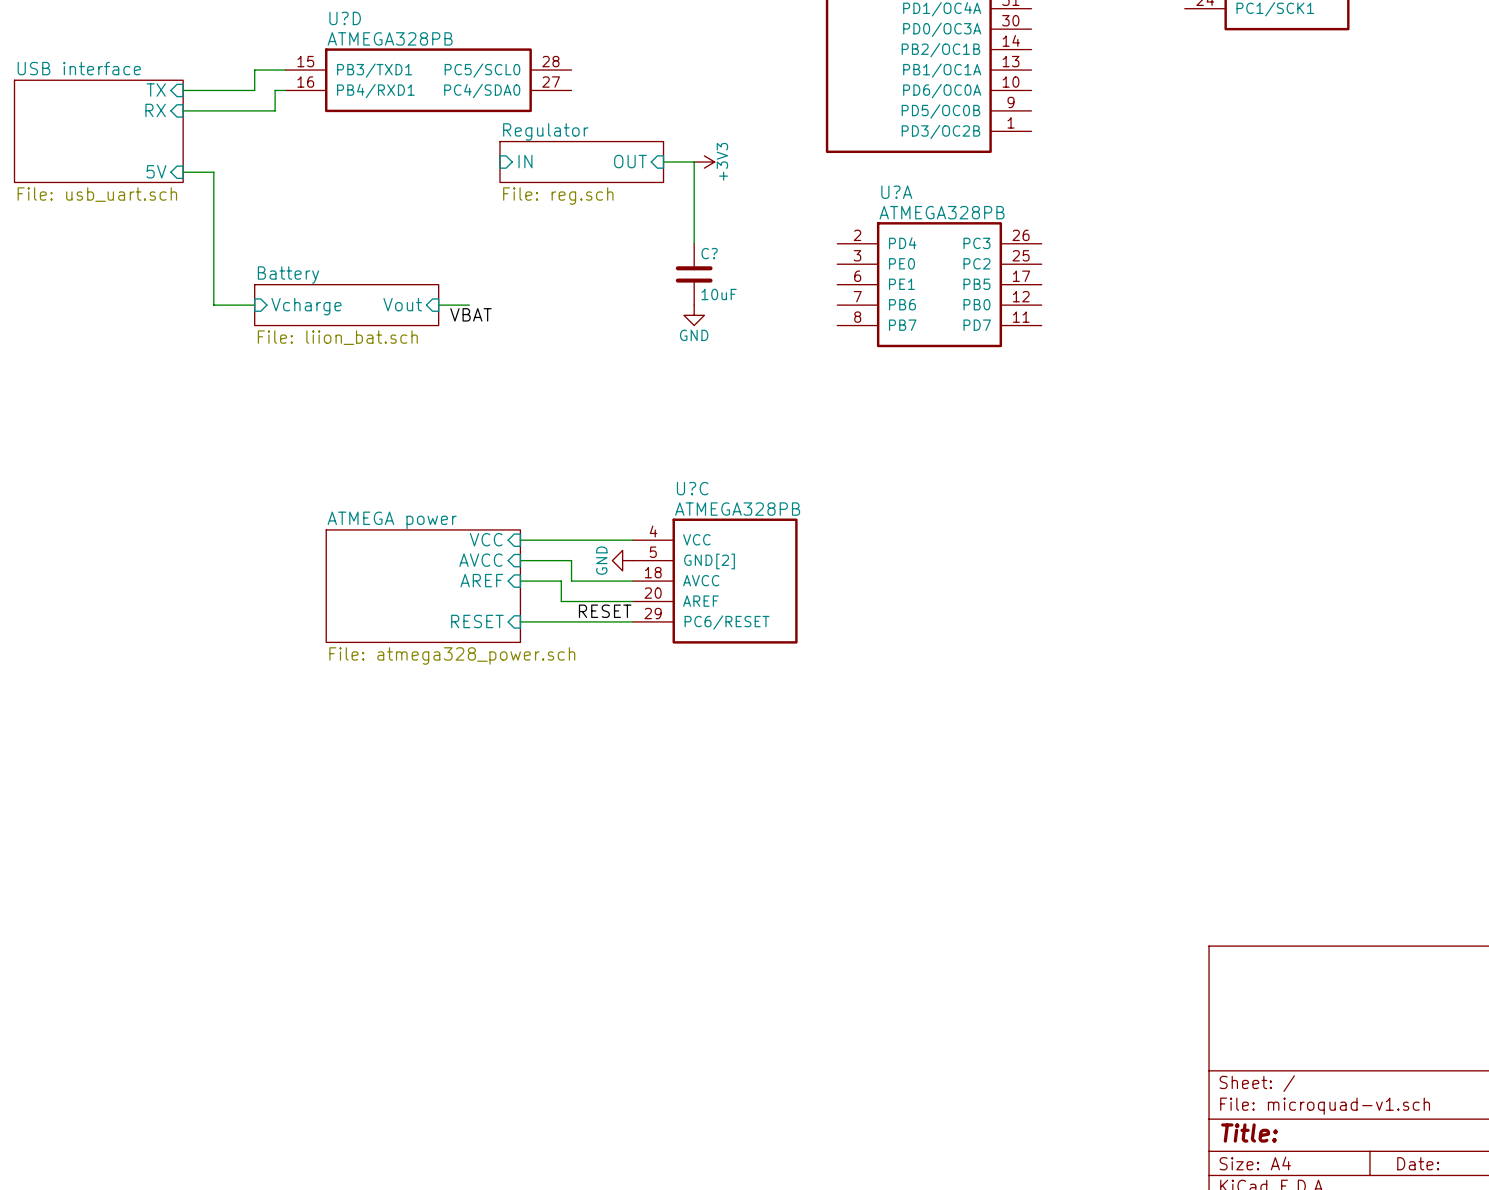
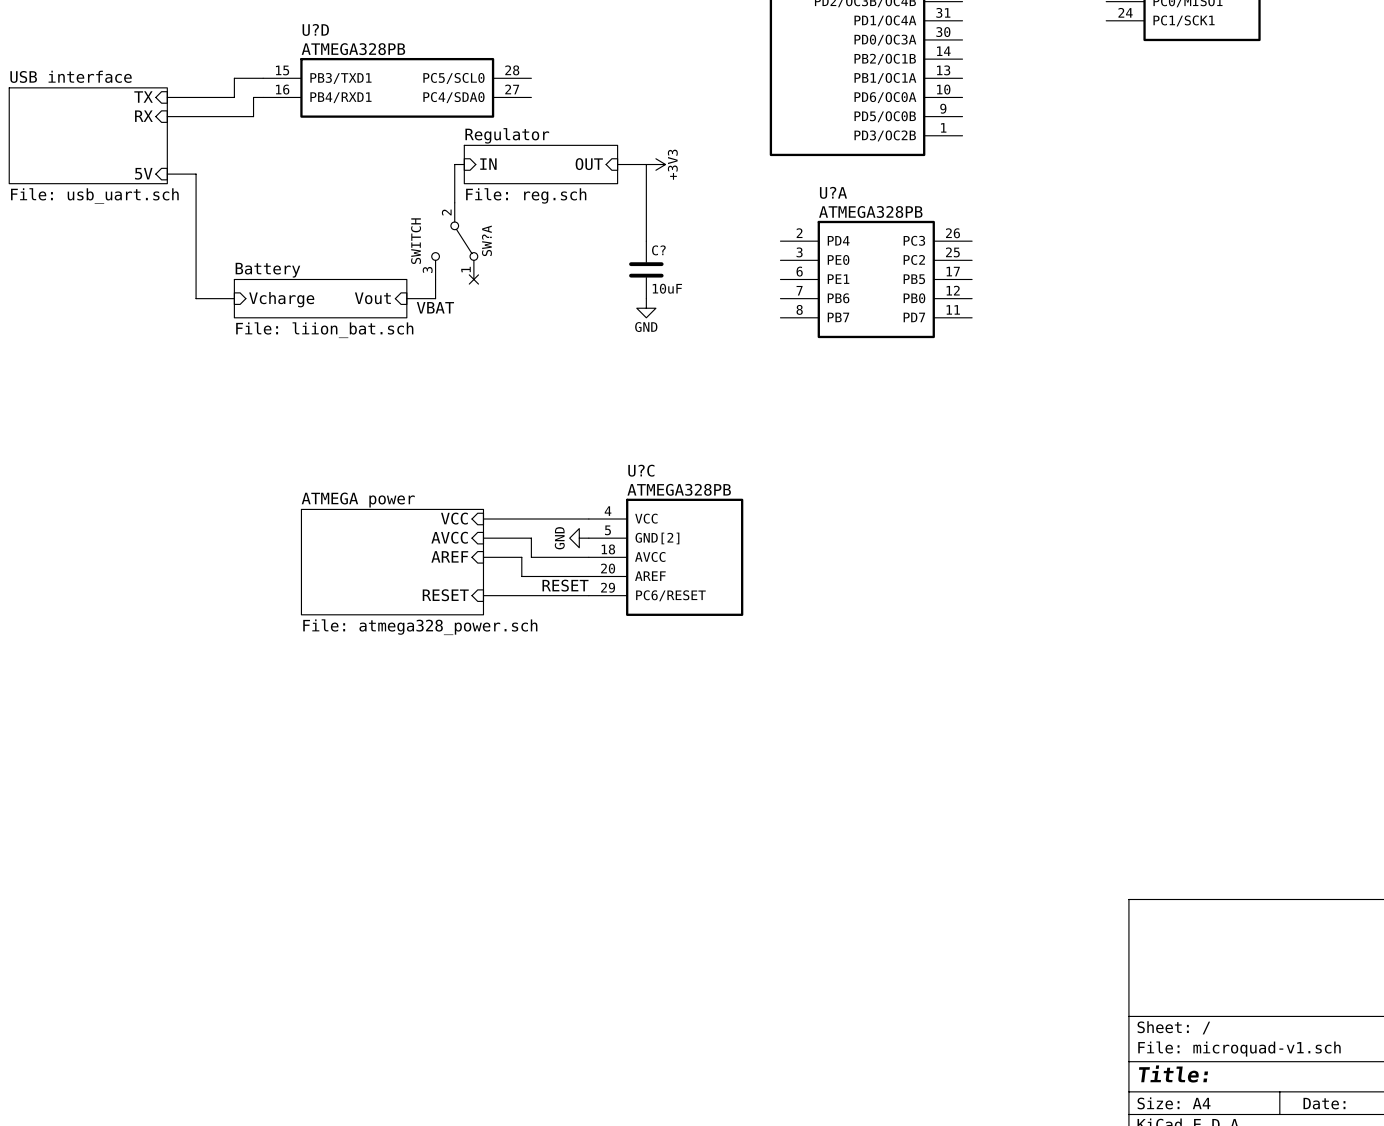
wire: none -> (464, 164) (454, 164) (454, 202)
SW?A: none -> SWITCH (454, 241)
wire: none -> (435, 279) (435, 298)
no-connect mark: none -> (473, 279)

